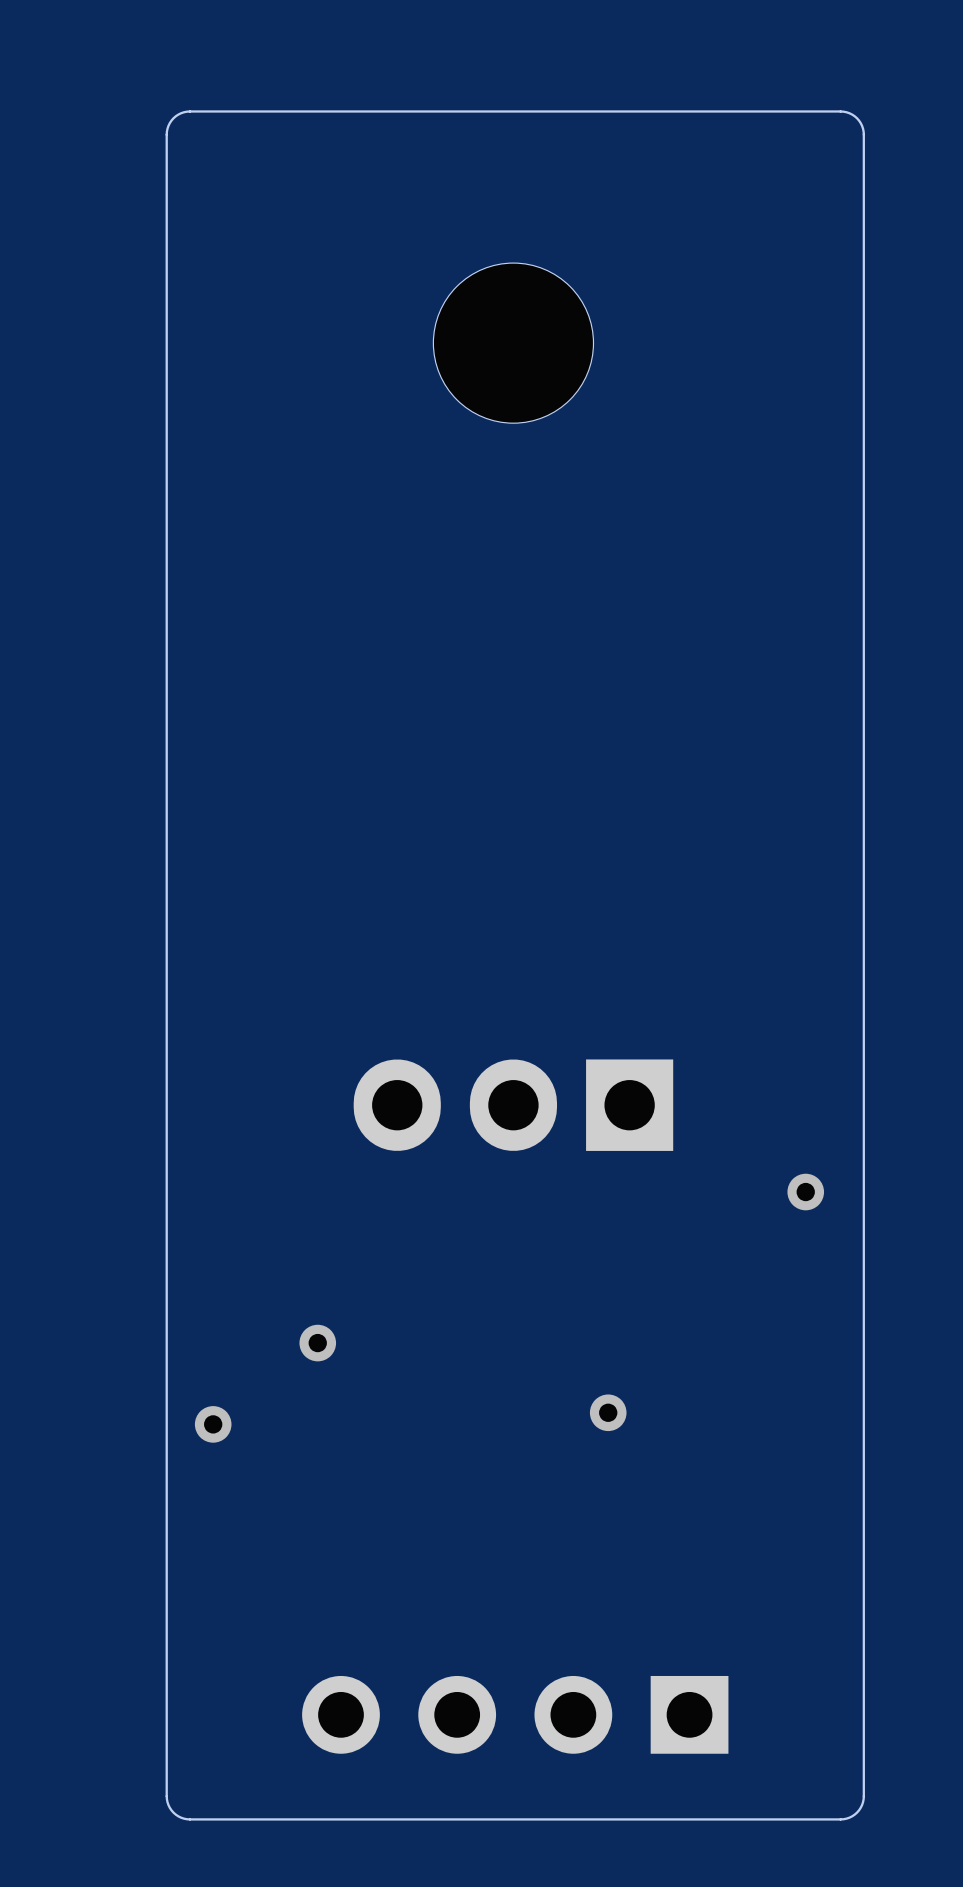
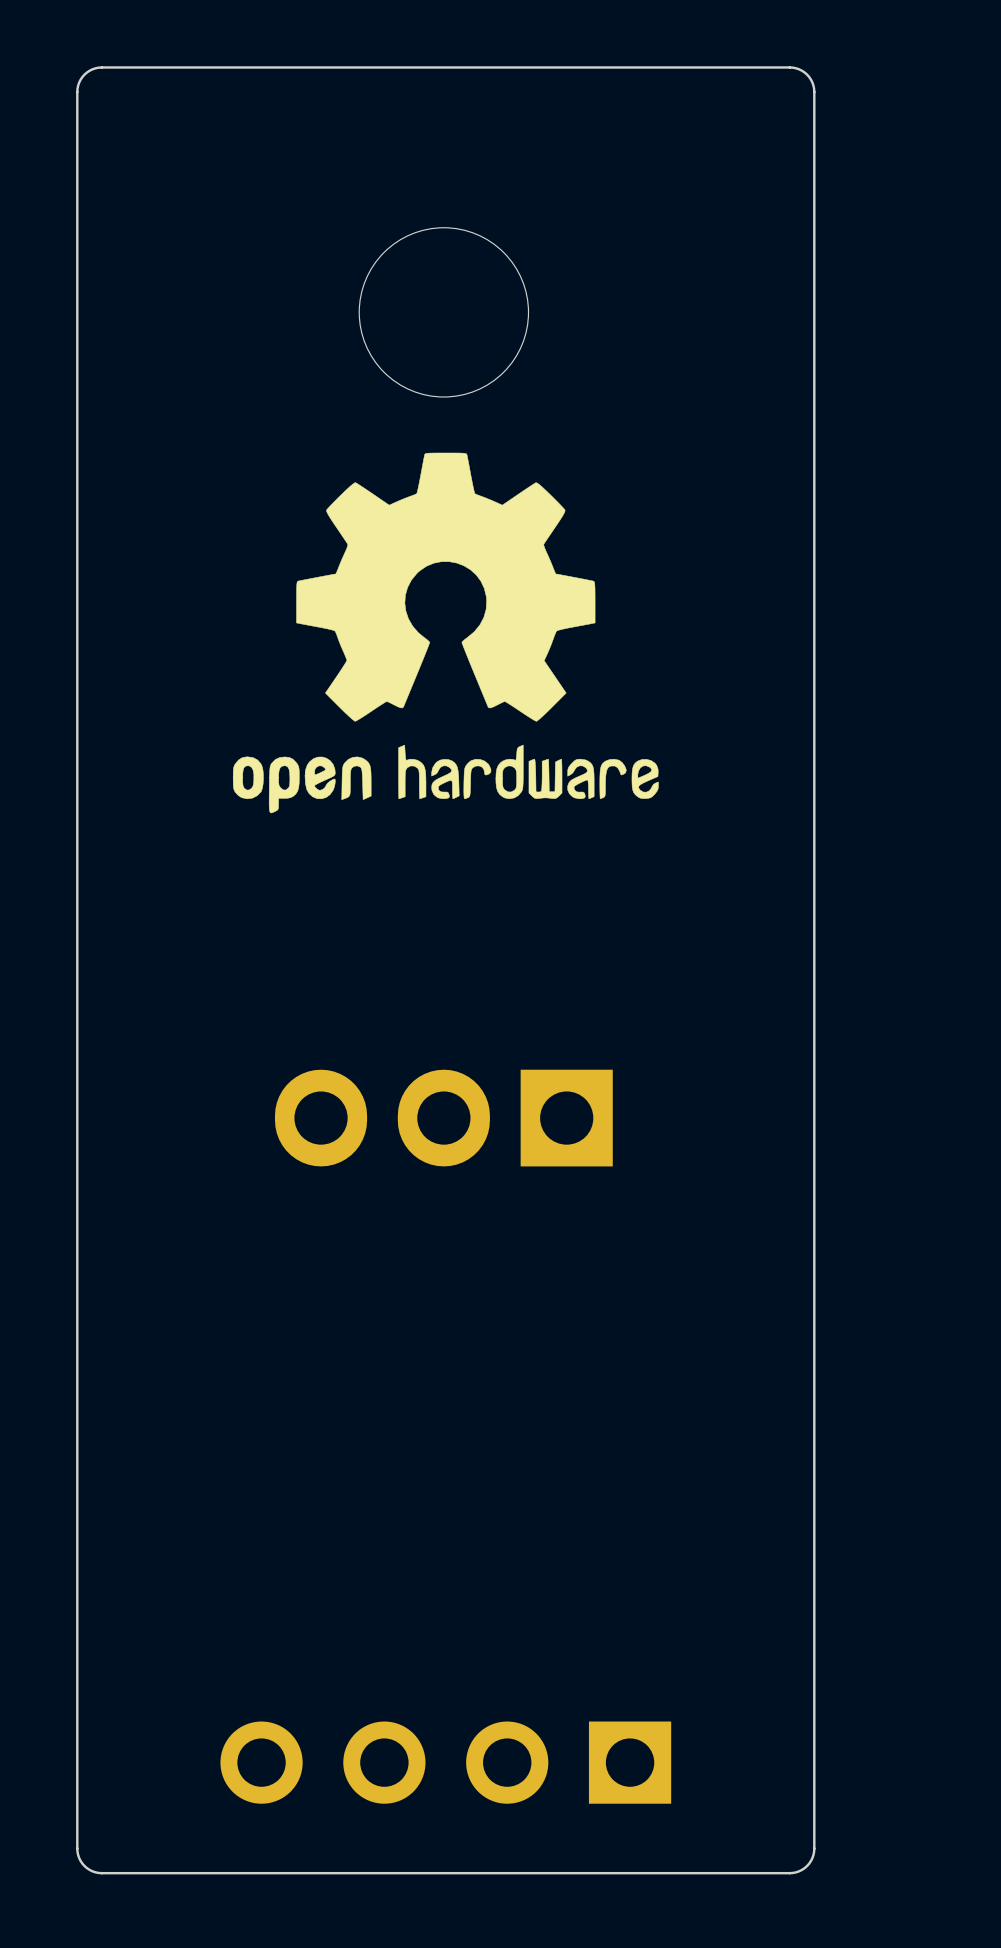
drawing: none -> [232, 452, 659, 814]
via: (805, 1192) -> none
via: (317, 1343) -> none
via: (608, 1412) -> none
via: (213, 1424) -> none

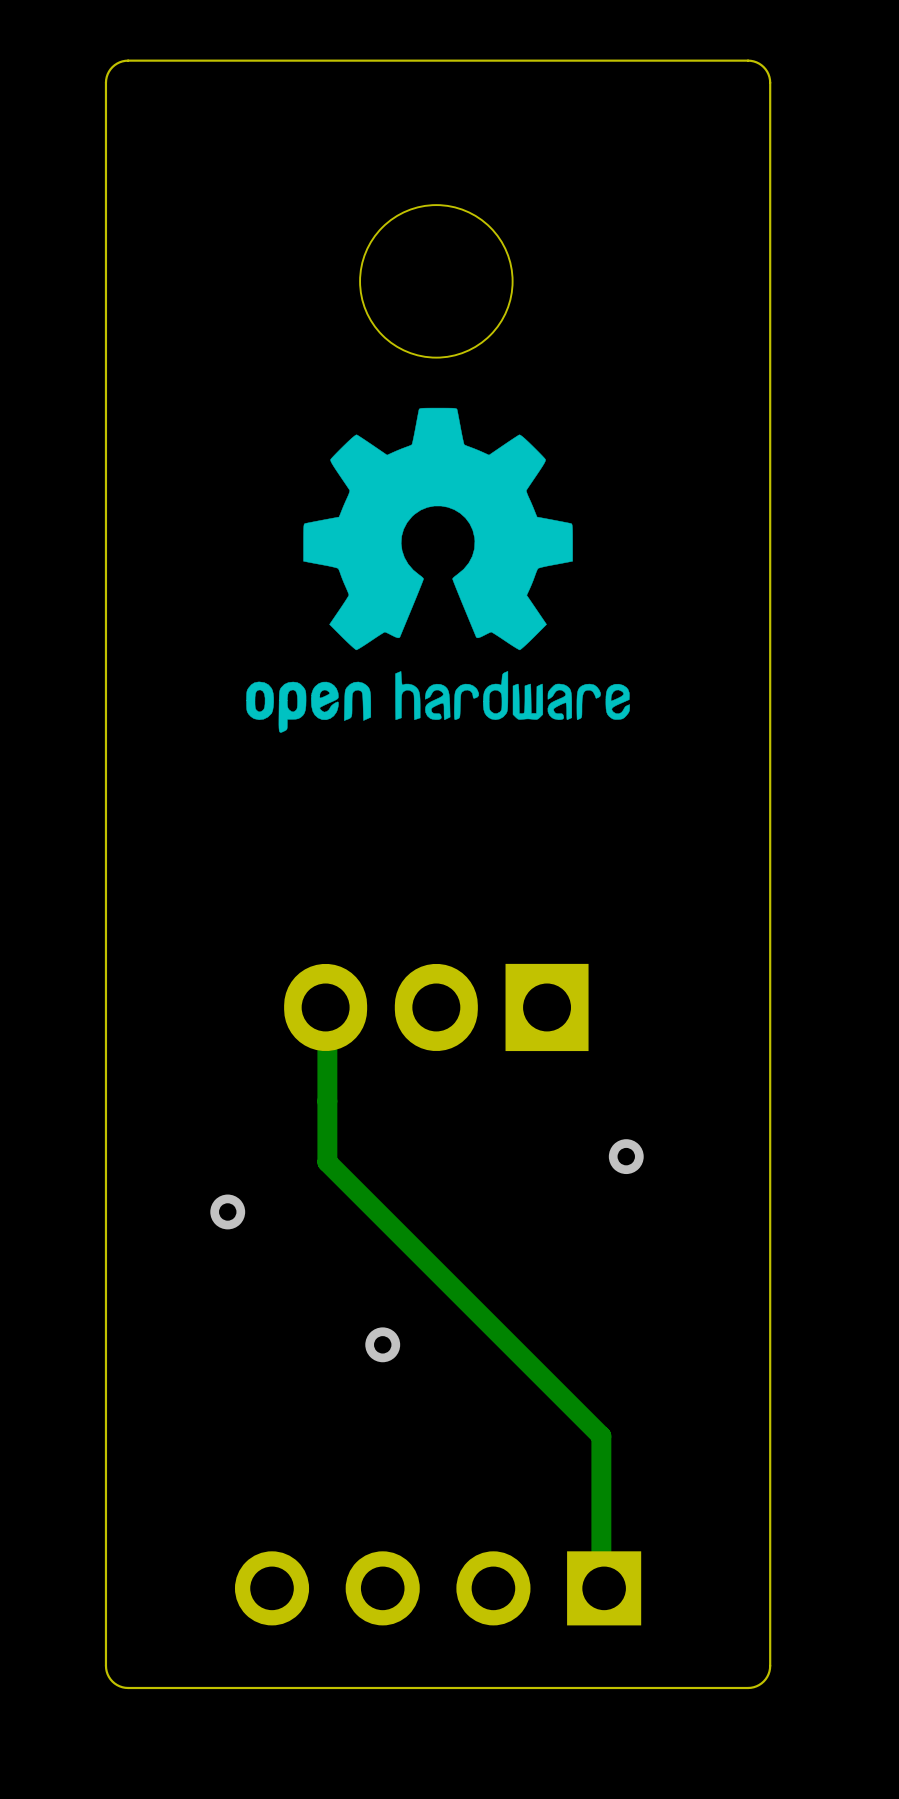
track: none -> (325, 1007) (327, 1011) (327, 1162) (601, 1436) (601, 1588)
via: none -> (626, 1156)
via: none -> (227, 1211)
via: none -> (382, 1344)

